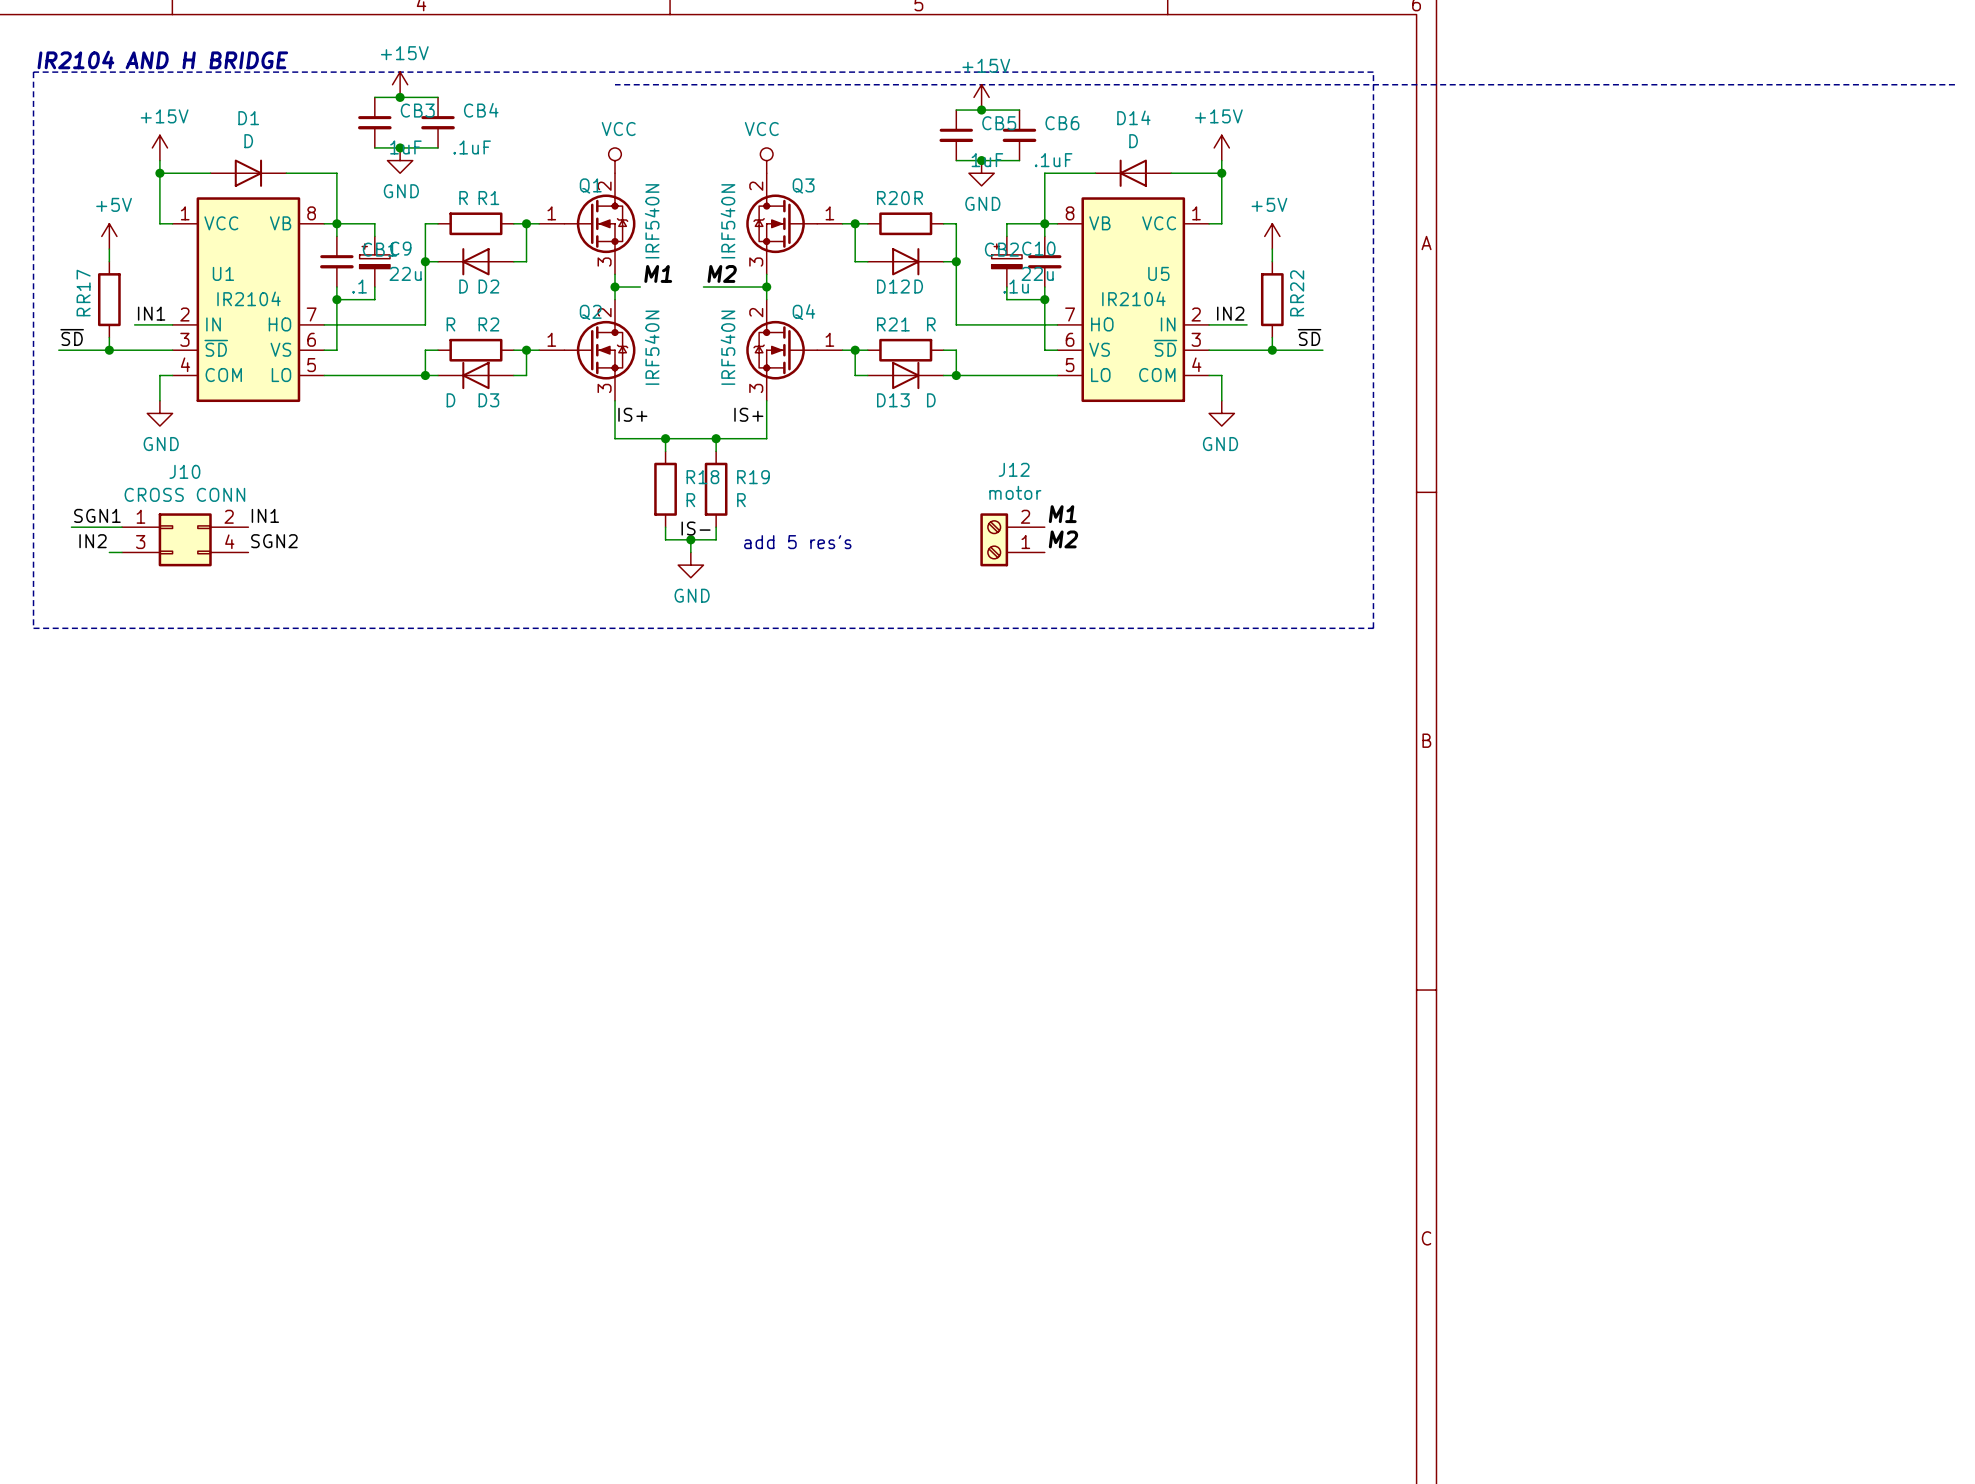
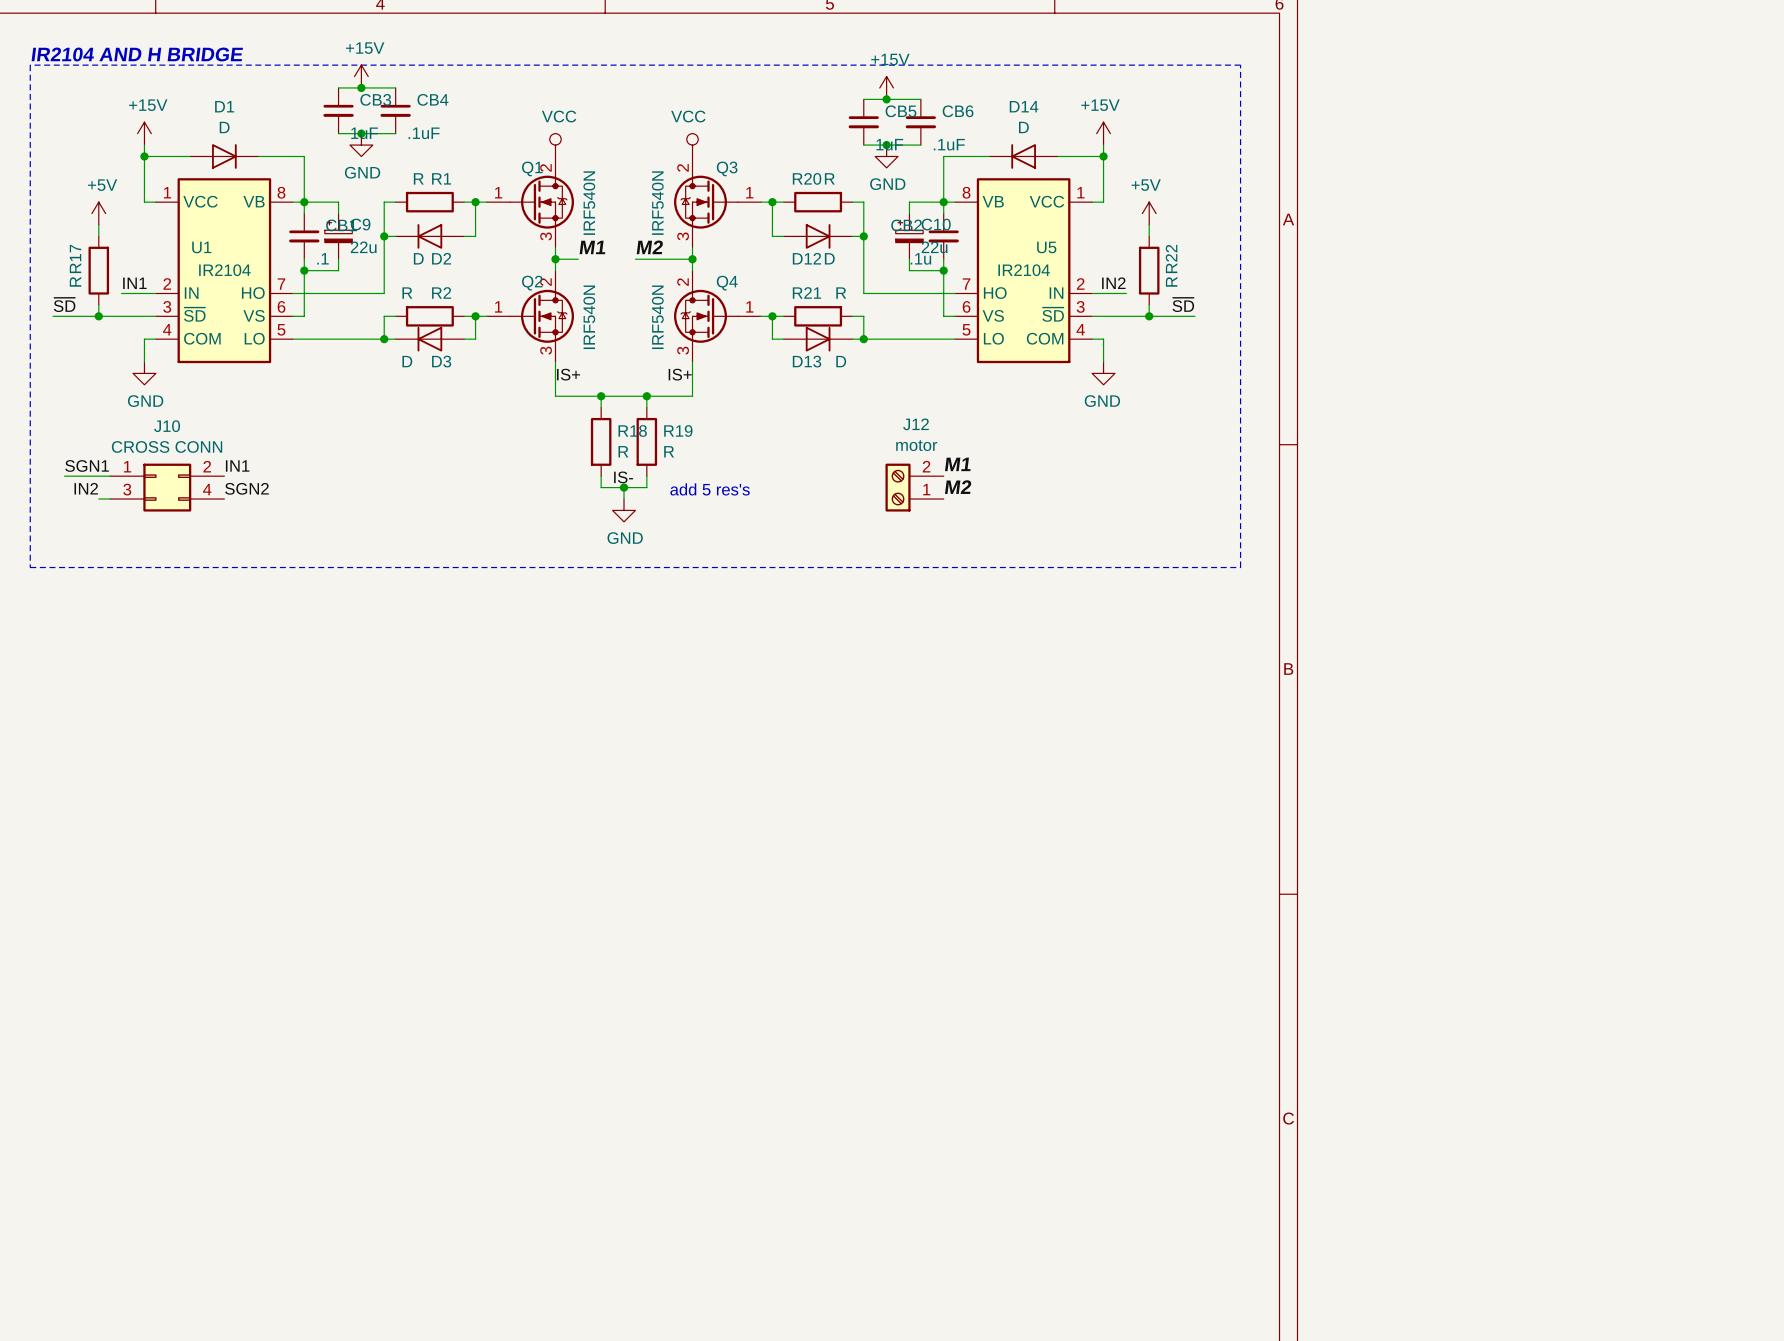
line: (615, 84) (1954, 84) -> none

